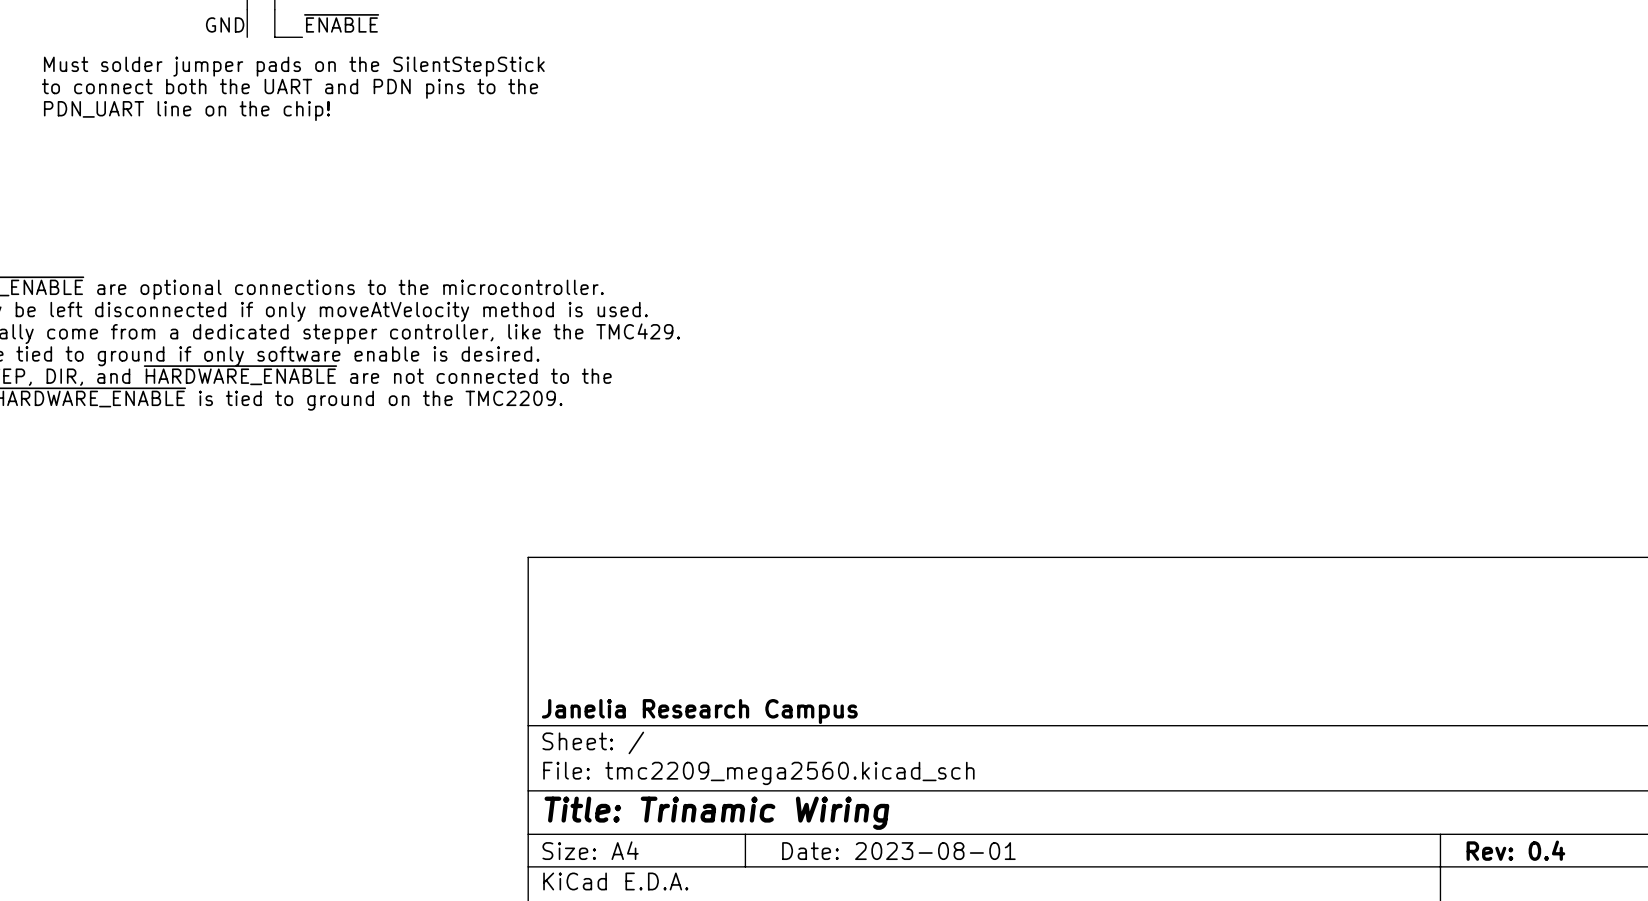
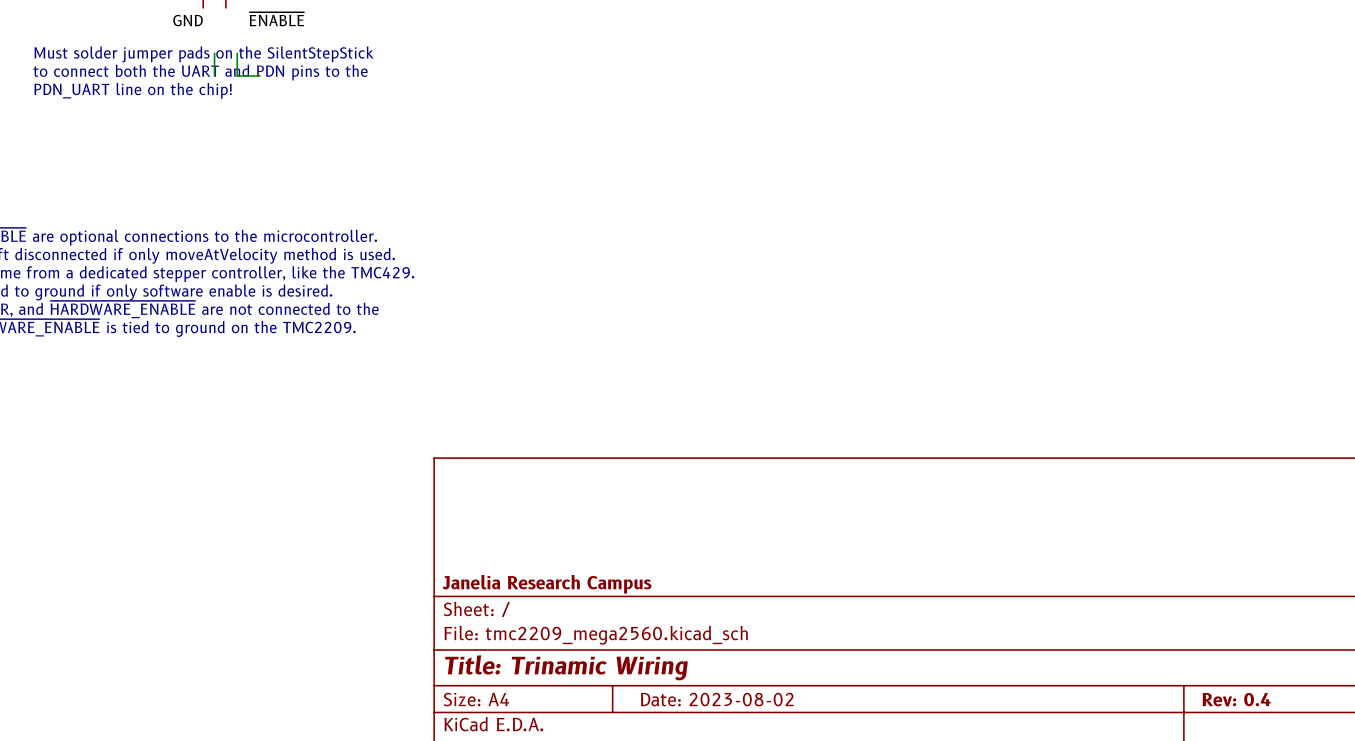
wire: (247, 9) (247, 37) -> (214, 53) (214, 75)
wire: (274, 9) (274, 37) (302, 37) -> (237, 53) (237, 75) (259, 75)
title block: Date: 2023-08-01 (898, 851) -> Date: 2023-08-02 (717, 699)

